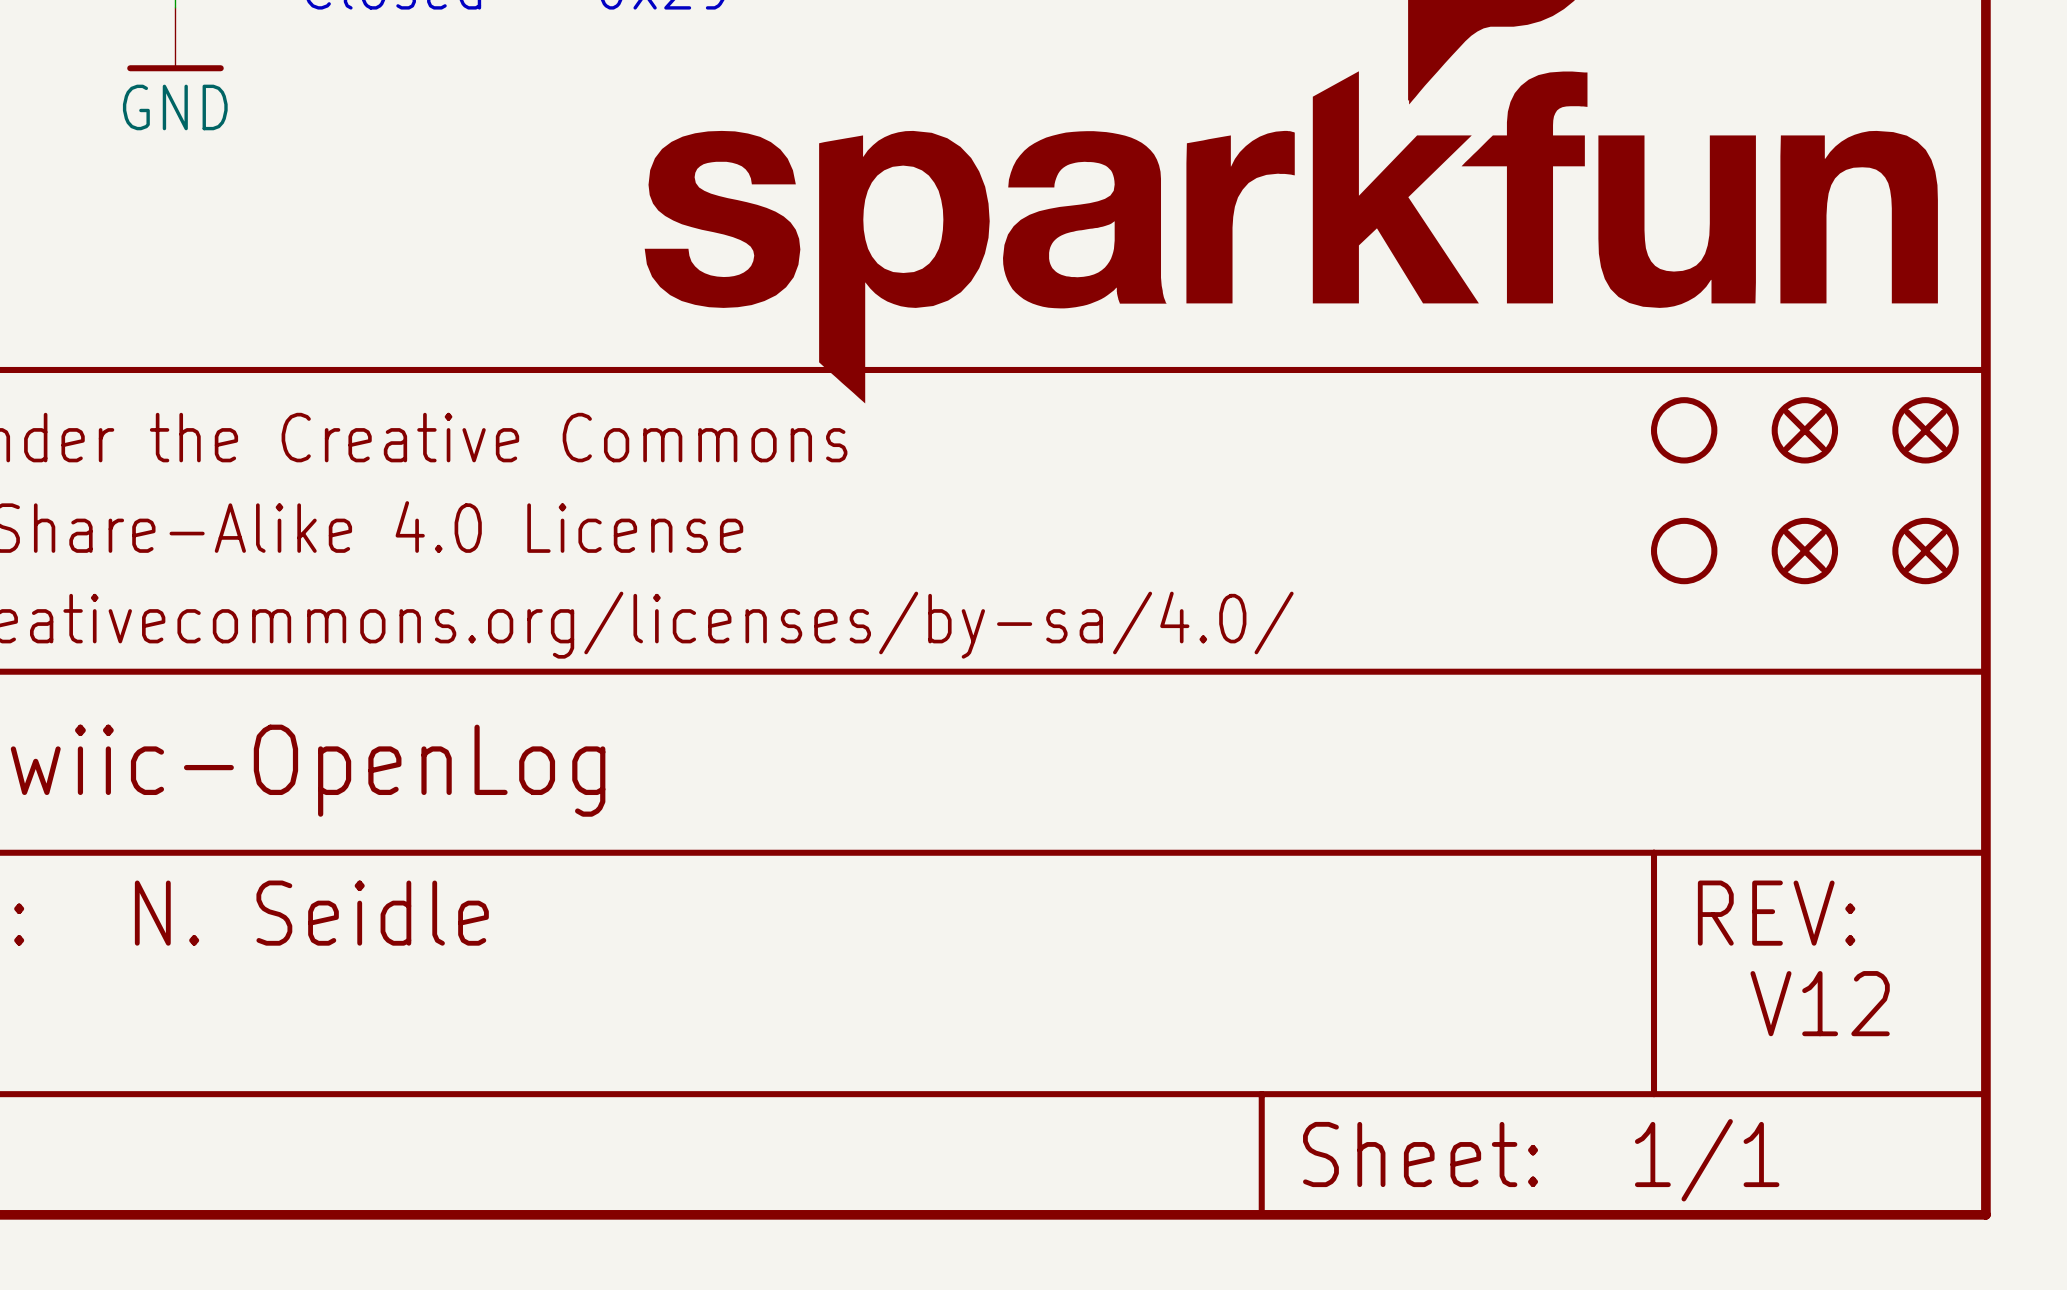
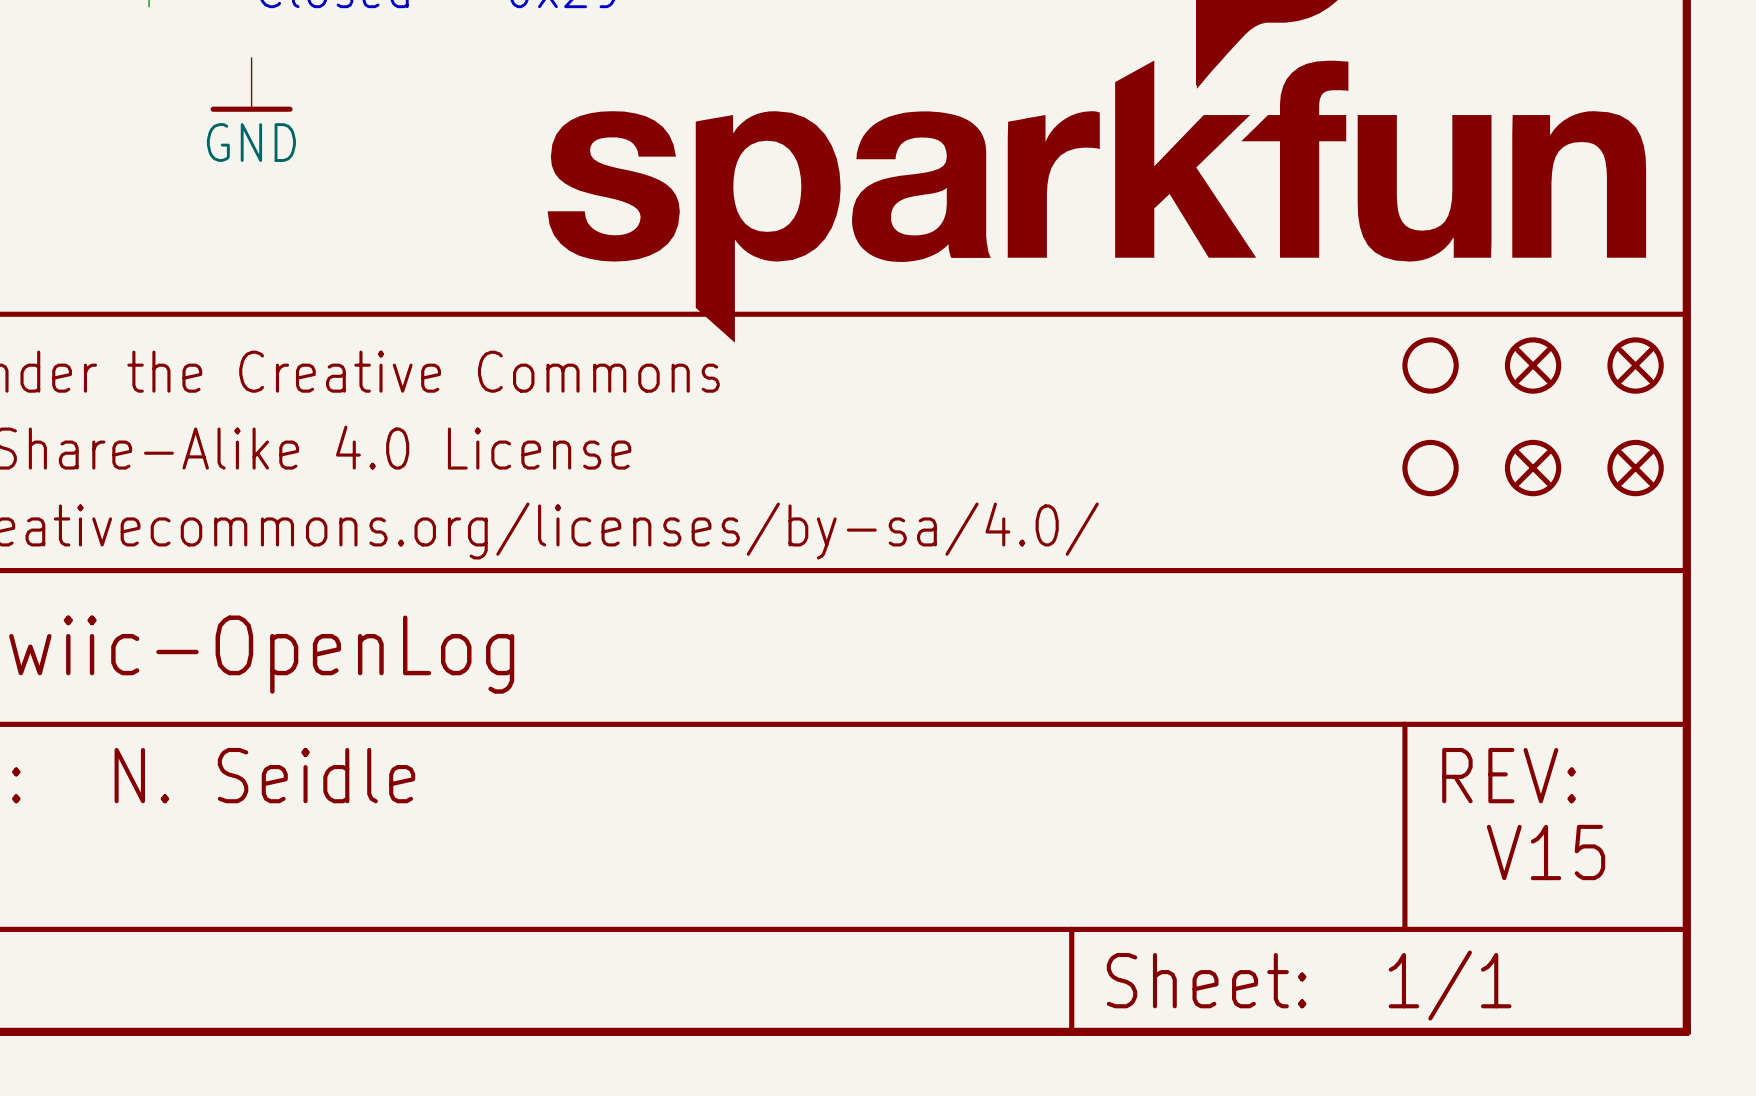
power symbol position: GND (175, 39) -> GND (251, 84)
text: V12 (1820, 1003) -> V15 (1546, 852)

